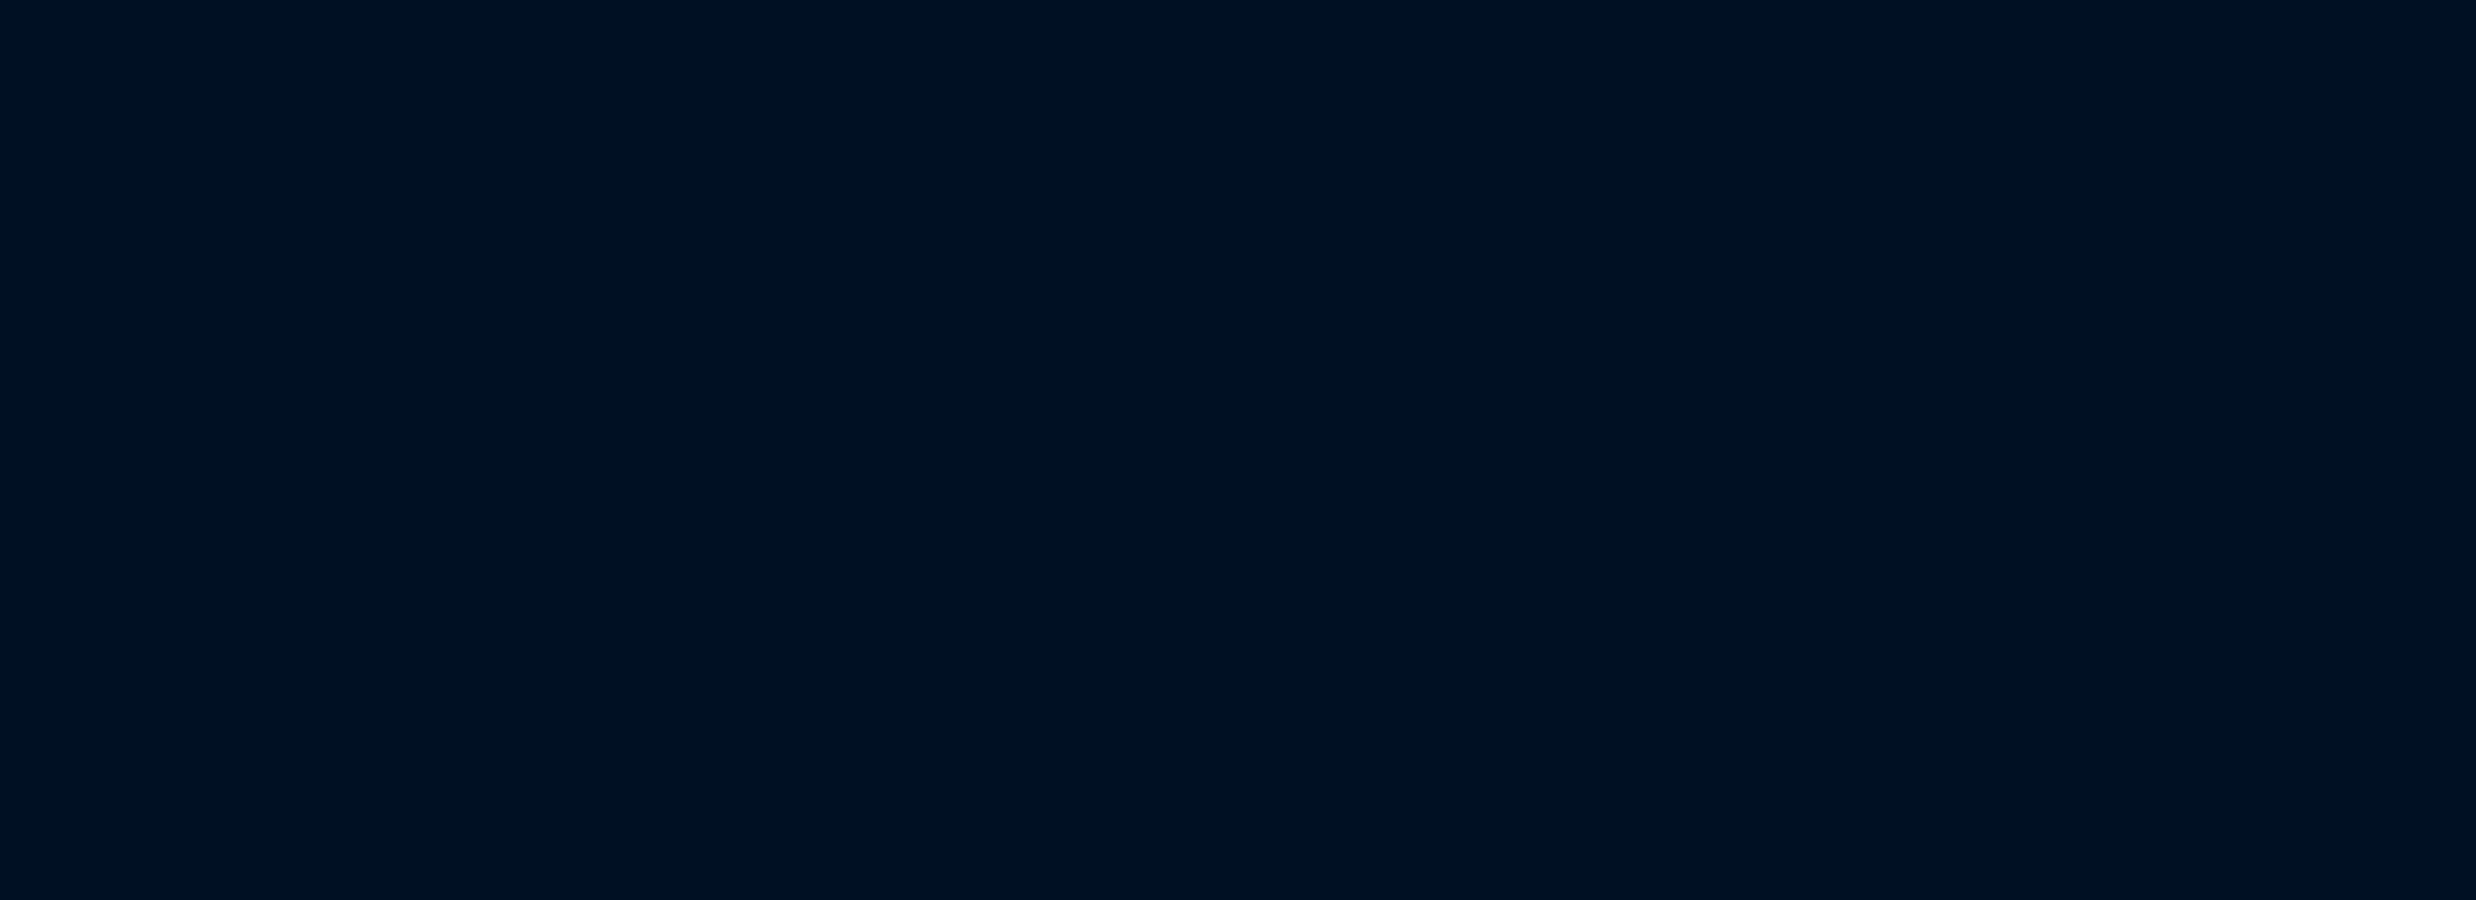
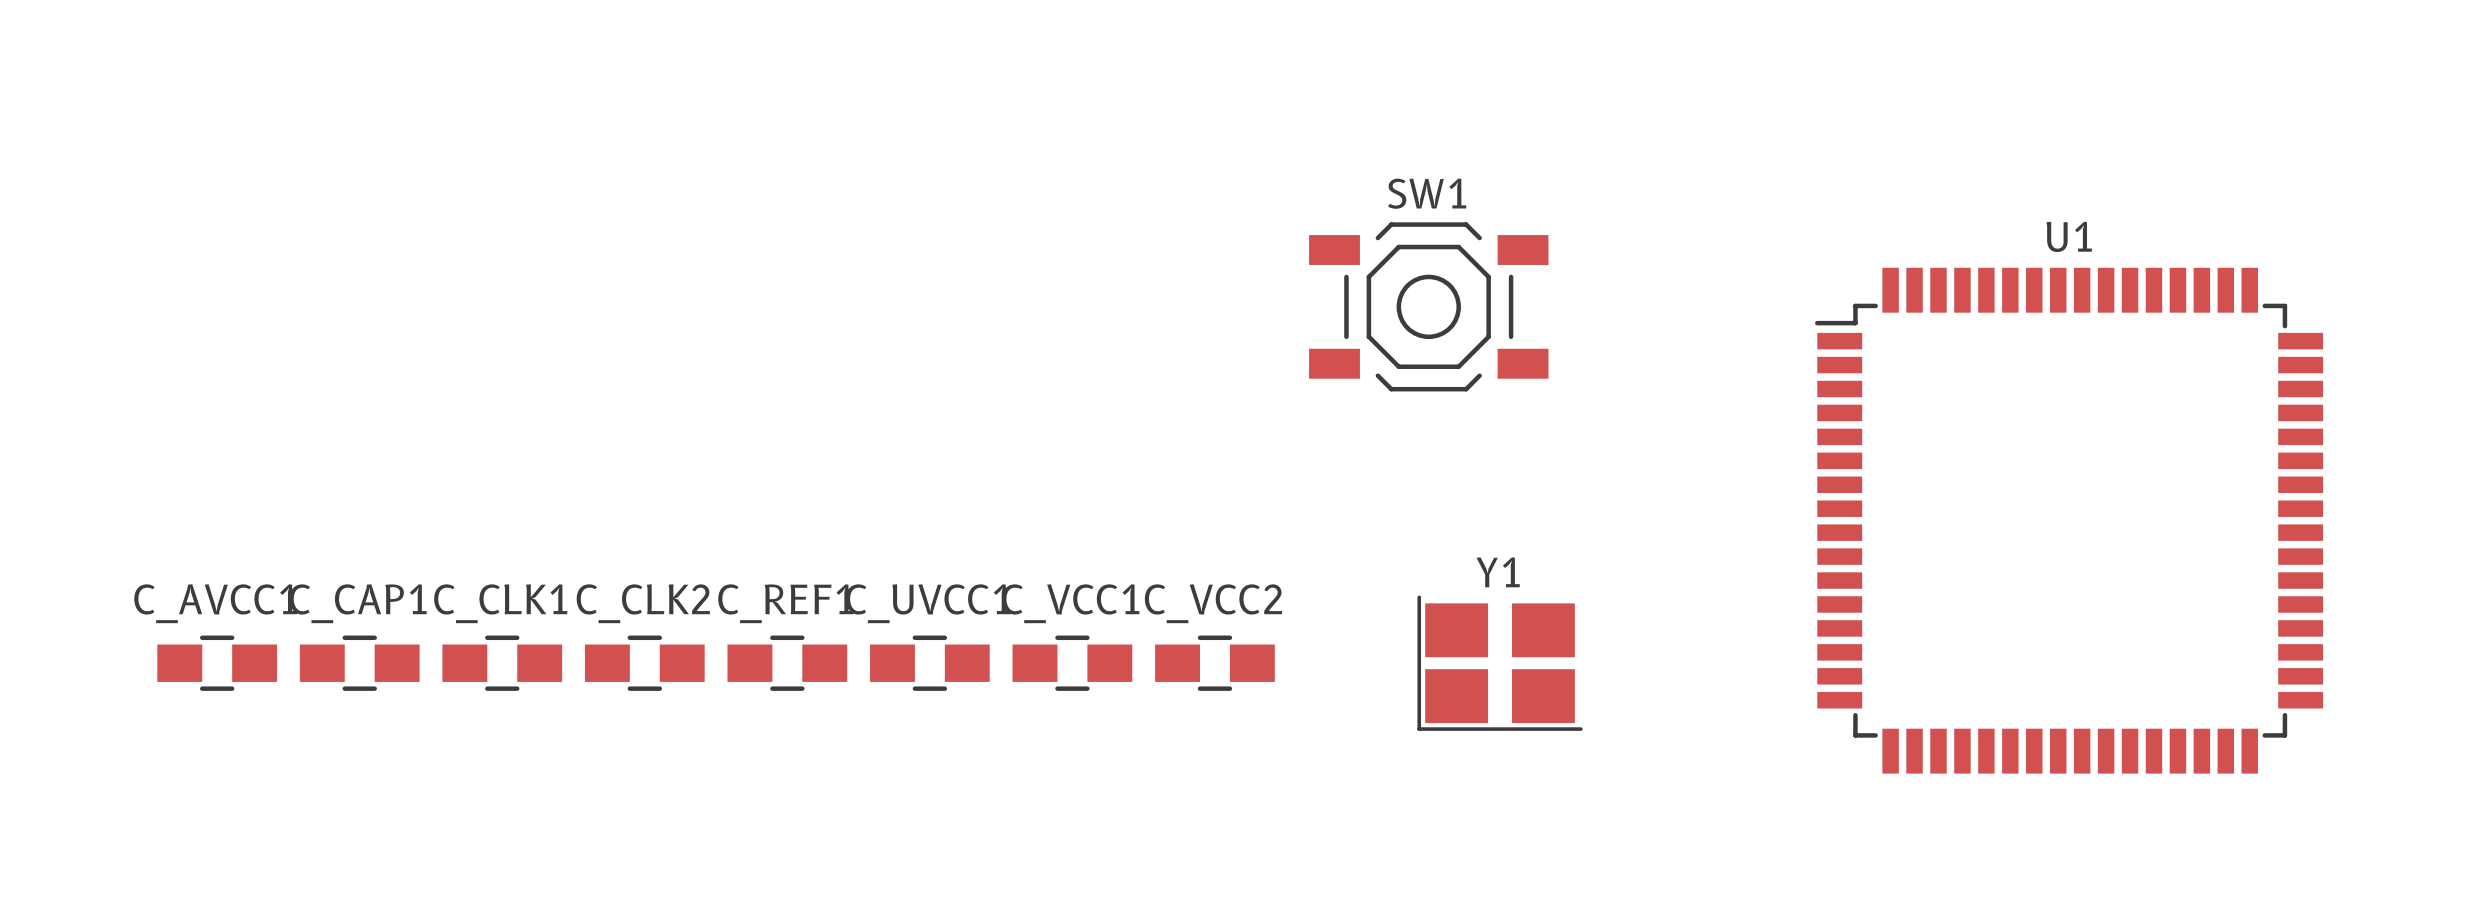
SW1: none -> (1428, 306)
U1: none -> (2069, 520)
C_AVCC1: none -> (217, 663)
C_CAP1: none -> (359, 663)
C_CLK1: none -> (502, 663)
C_CLK2: none -> (644, 663)
C_REF1: none -> (787, 663)
C_UVCC1: none -> (929, 663)
C_VCC1: none -> (1072, 663)
C_VCC2: none -> (1214, 663)
Y1: none -> (1500, 663)

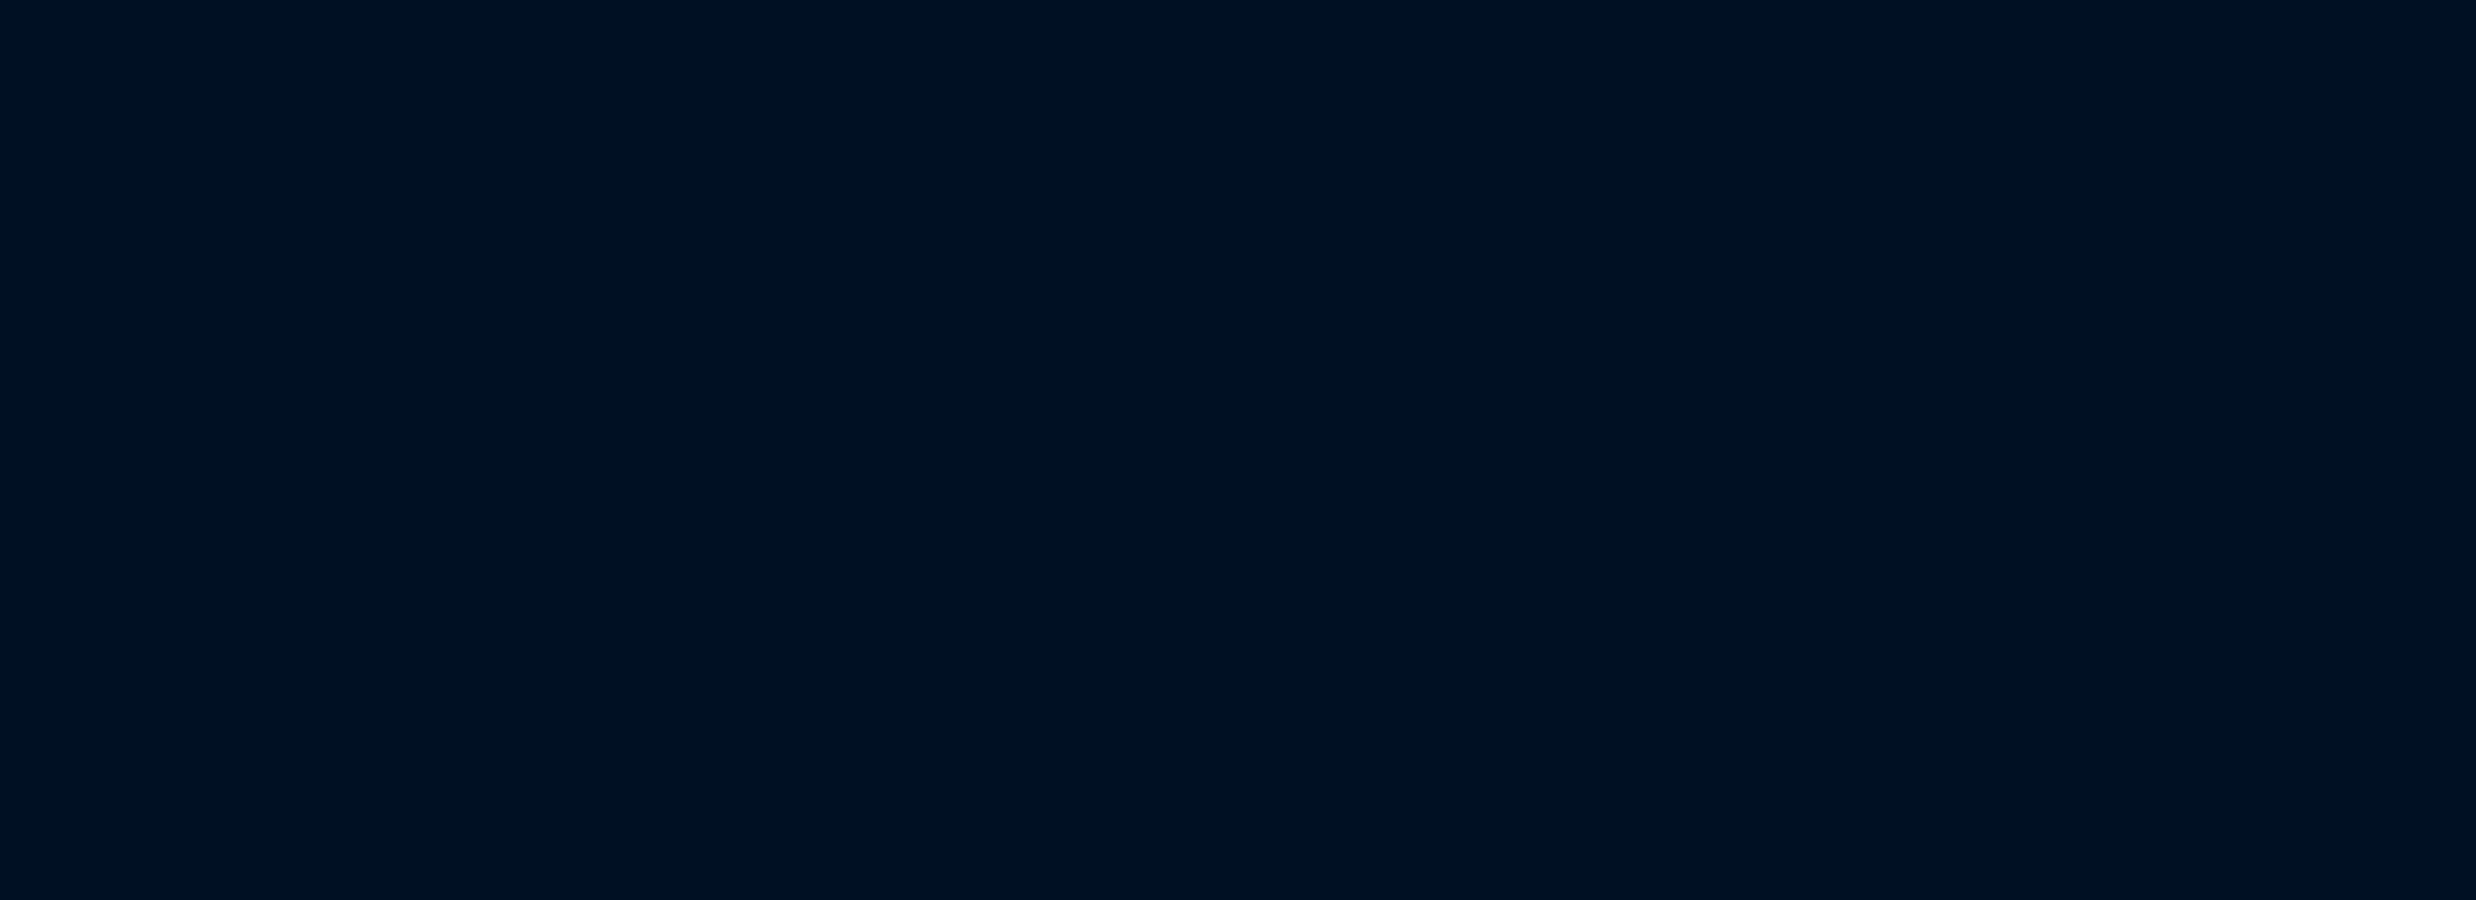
SW1: (1428, 306) -> none
U1: (2069, 520) -> none
C_AVCC1: (217, 663) -> none
C_CAP1: (359, 663) -> none
C_CLK1: (502, 663) -> none
C_CLK2: (644, 663) -> none
C_REF1: (787, 663) -> none
C_UVCC1: (929, 663) -> none
C_VCC1: (1072, 663) -> none
C_VCC2: (1214, 663) -> none
Y1: (1500, 663) -> none

